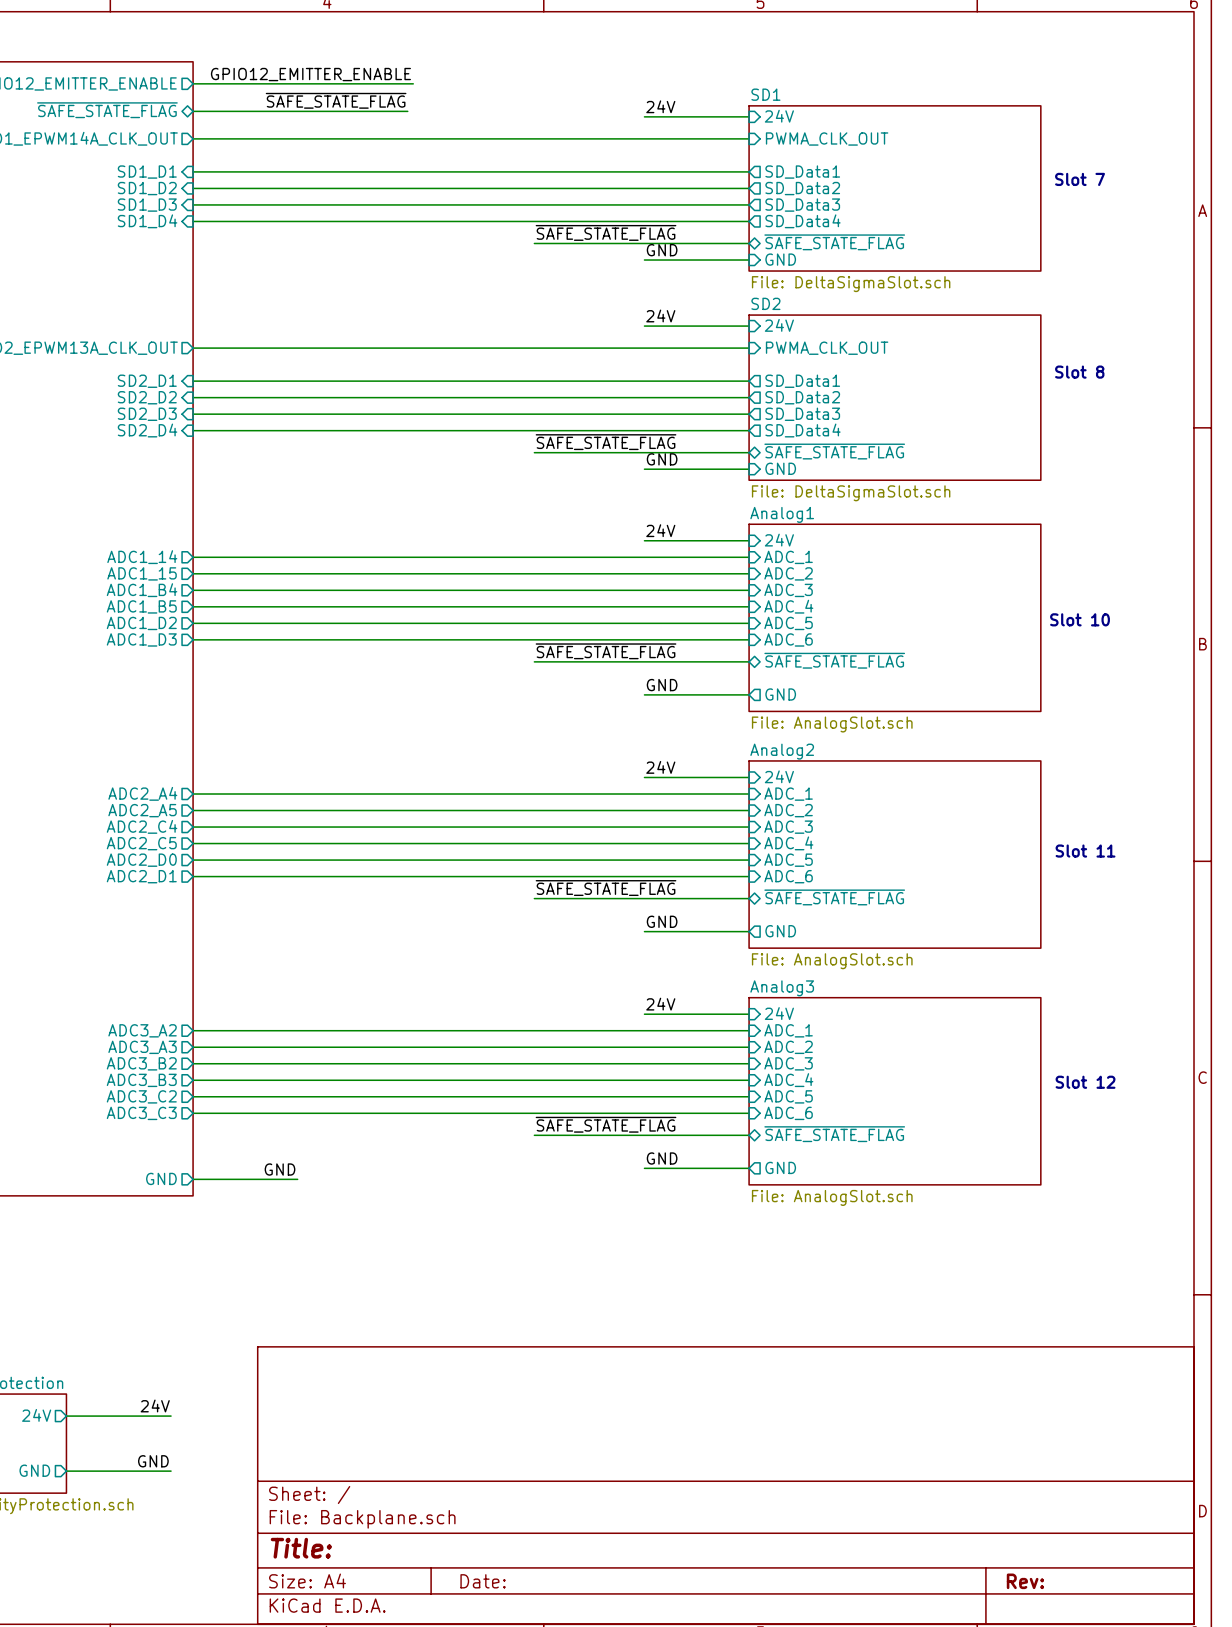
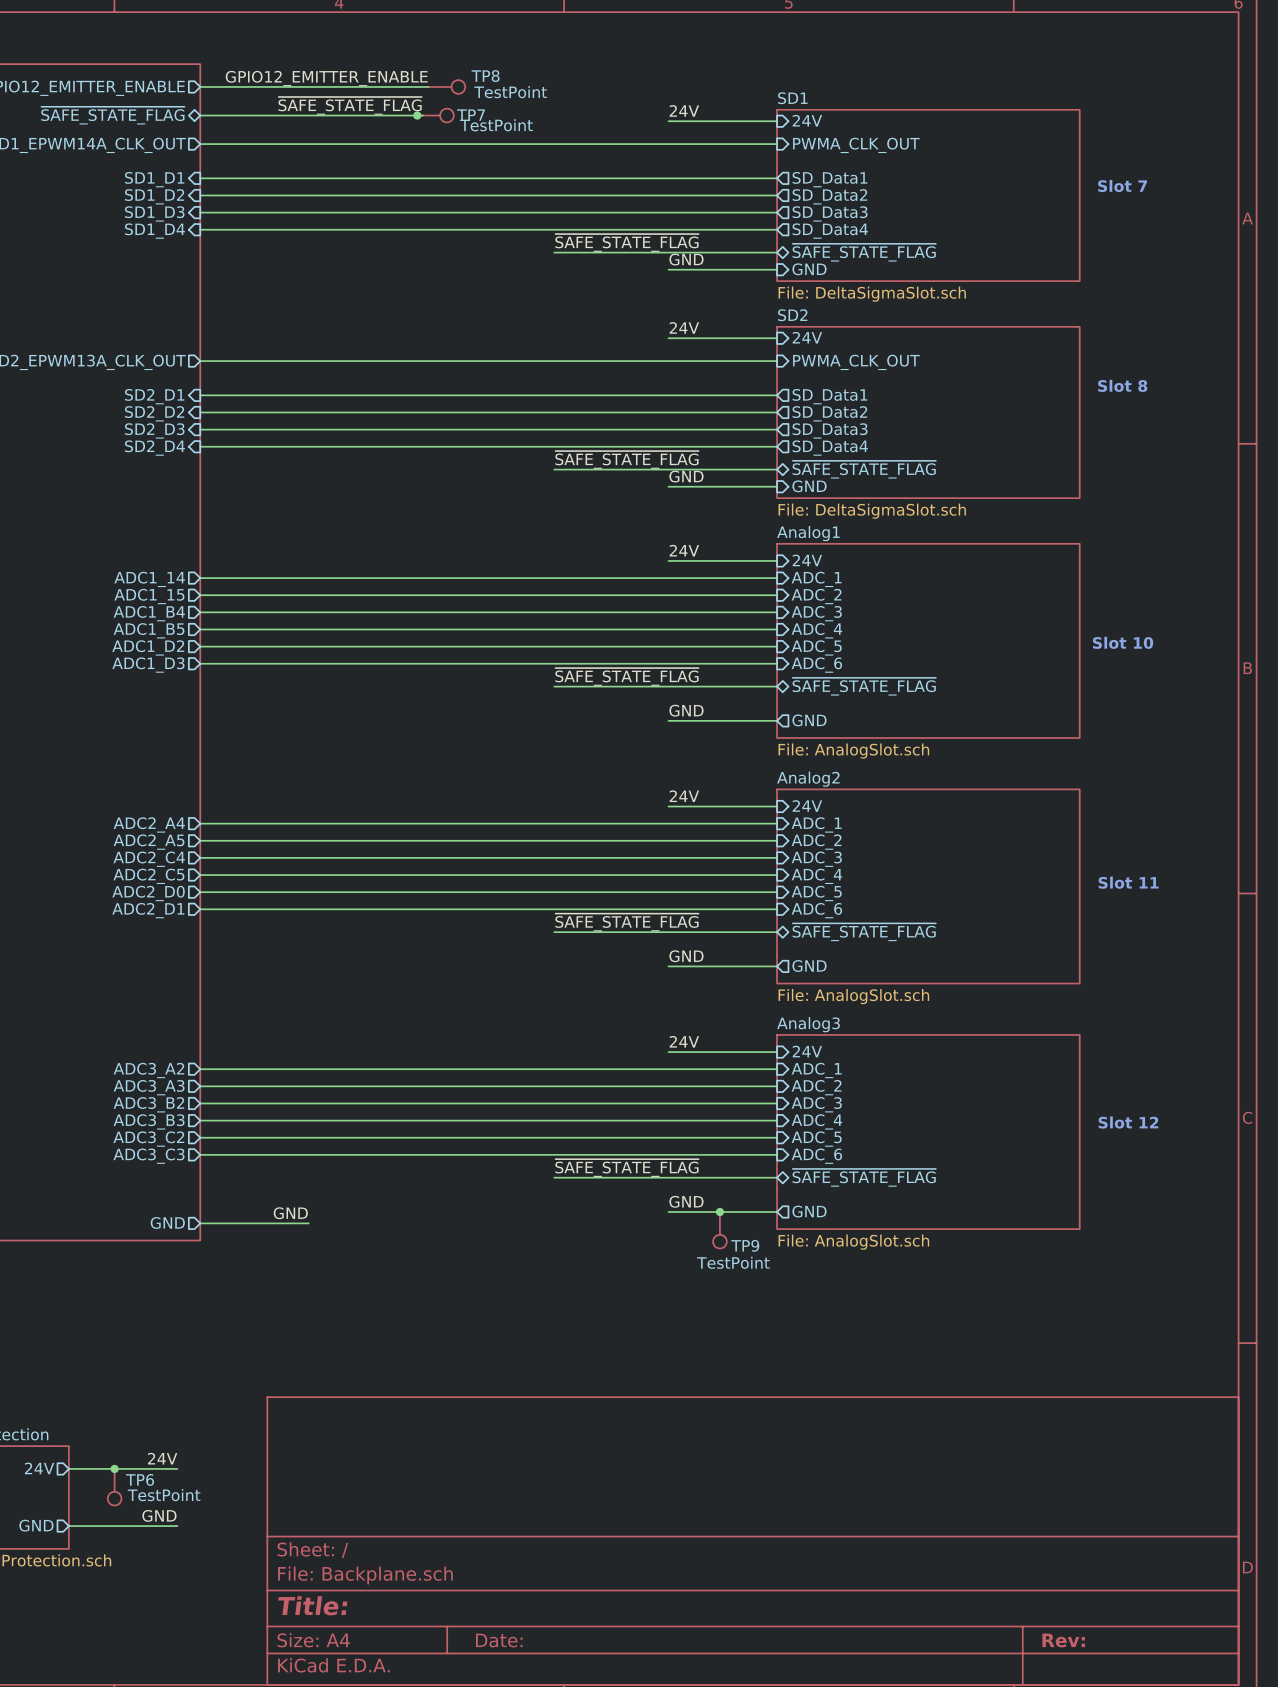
TP8: none -> TestPoint (446, 86)
junction: none -> (417, 115)
TP7: none -> TestPoint (435, 115)
junction: none -> (719, 1211)
TP9: none -> TestPoint (719, 1230)
junction: none -> (114, 1468)
TP6: none -> TestPoint (114, 1487)

